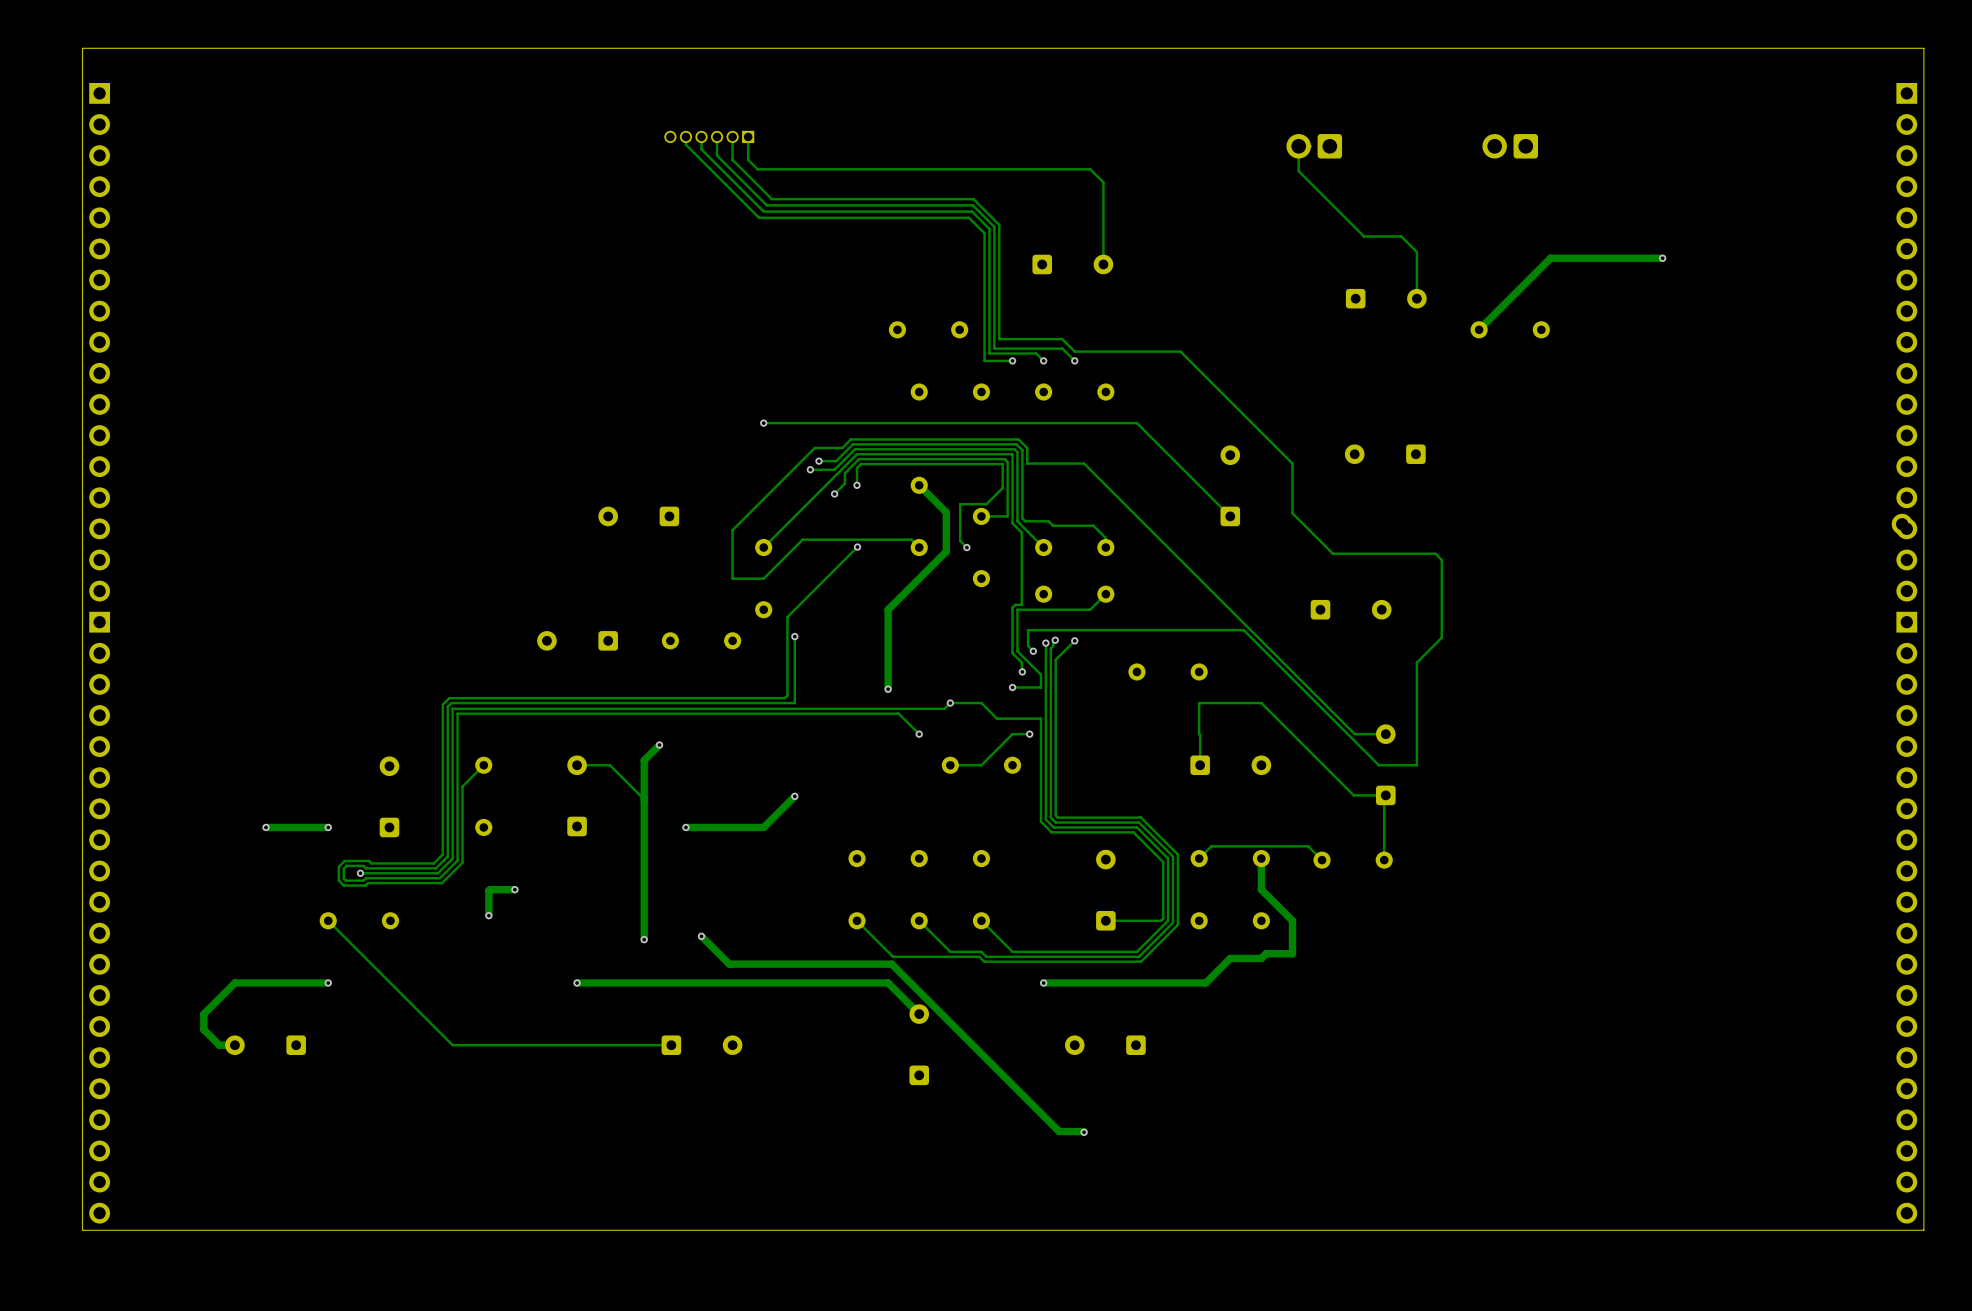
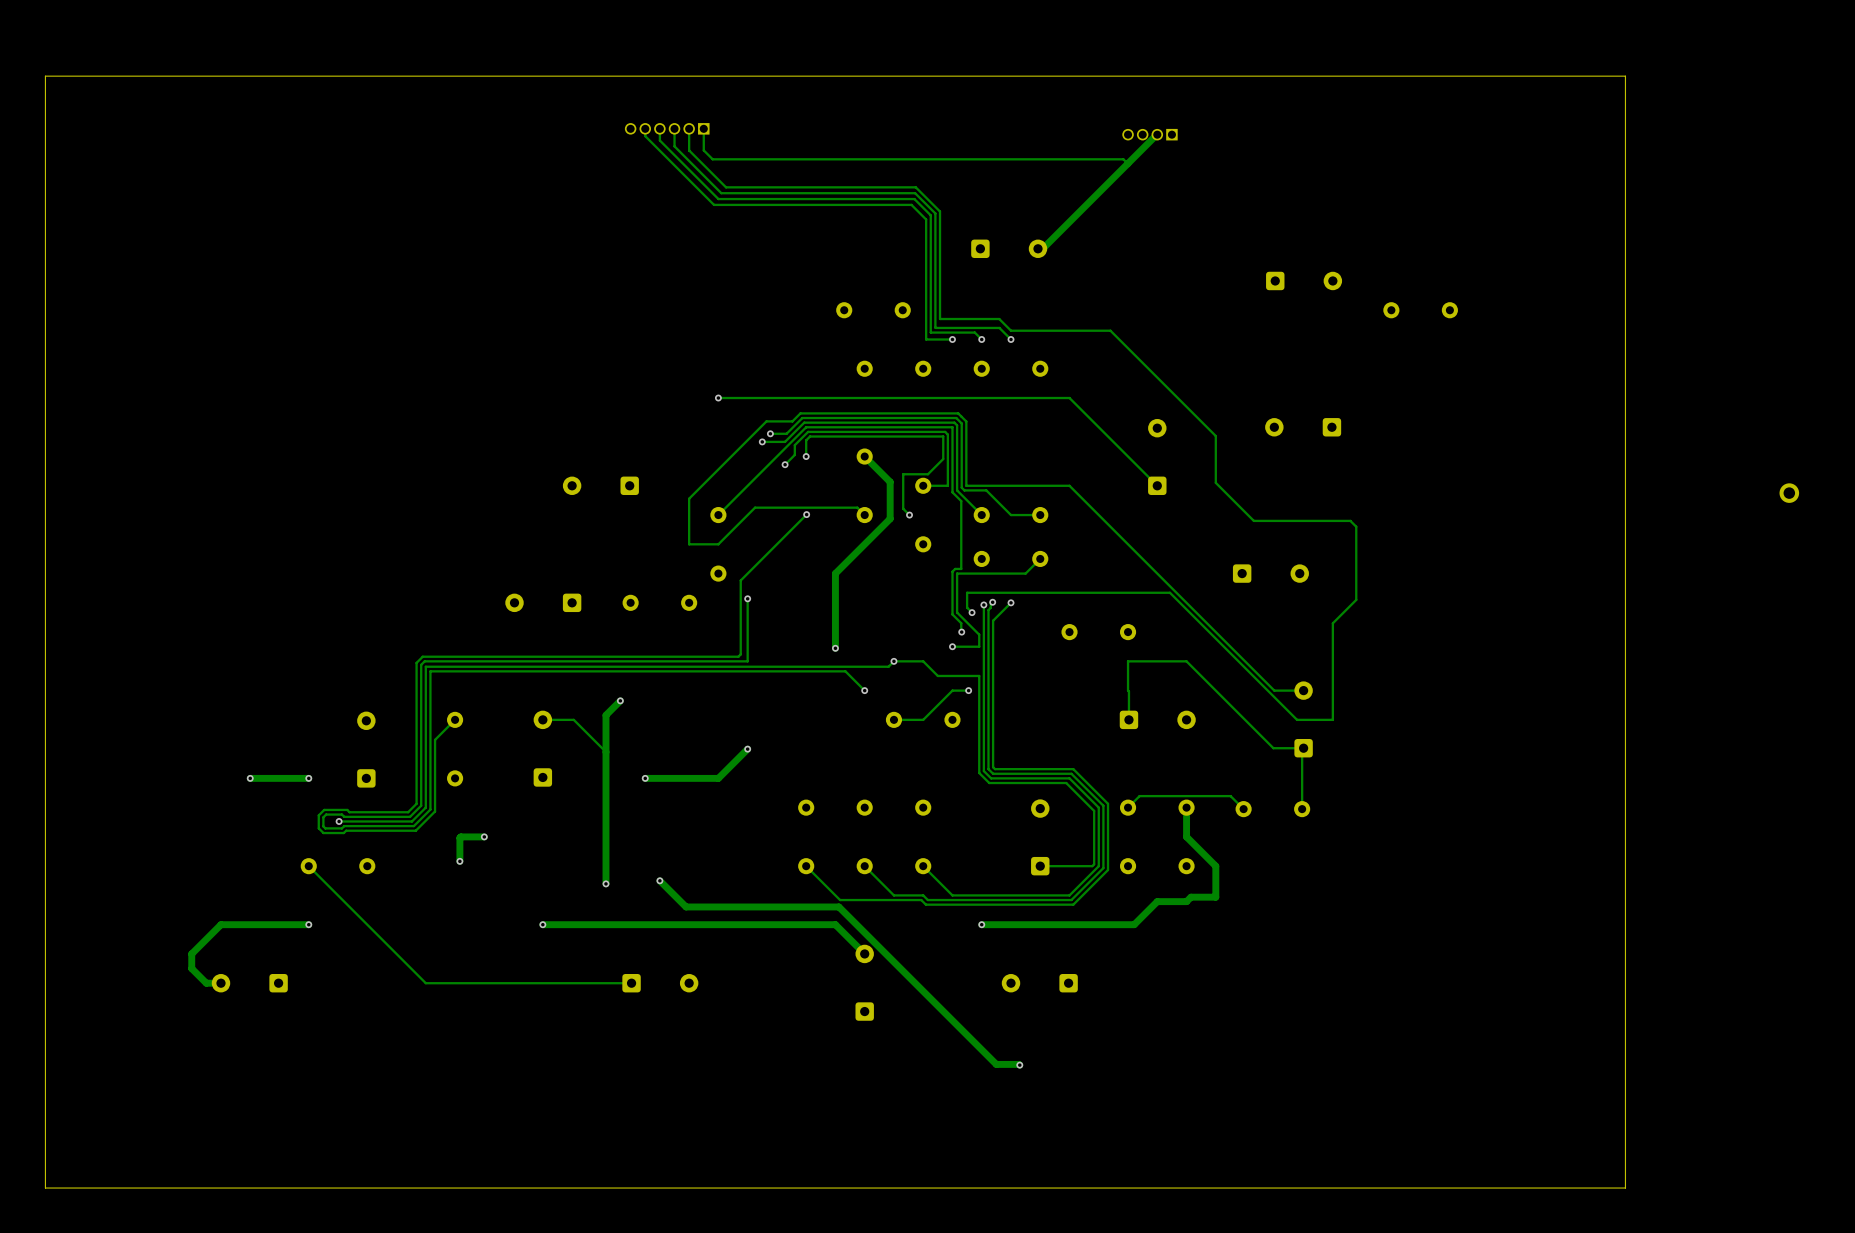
board edge: (1923, 48) (82, 48) (82, 1230) (1923, 1230) (1923, 48) -> (1625, 76) (1625, 1188) (45, 1188) (45, 76) (1625, 76)
part: none -> (1149, 134)
track: none -> (1157, 134) (1039, 251)
track: (1311, 146) (1298, 146) (1298, 171) (1364, 236) (1401, 236) (1416, 252) (1416, 298) -> none
part: (1314, 146) -> none
part: (1510, 146) -> none
track: (1090, 169) (1103, 182) (1103, 264) -> (1025, 159) (1123, 159) (1127, 163)
track: (1662, 258) (1550, 258) (1479, 329) -> none
via: (1662, 258) -> none
part: (99, 342) -> none
part: (1906, 342) -> none
track: (1027, 463) (1084, 463) (1136, 516) -> (966, 436) (966, 485) (1069, 485)
track: (1052, 525) (1093, 525) (1105, 538) (1105, 547) -> (990, 494) (1011, 515) (1040, 515)
part: (99, 917) -> none
part: (1906, 917) -> none

